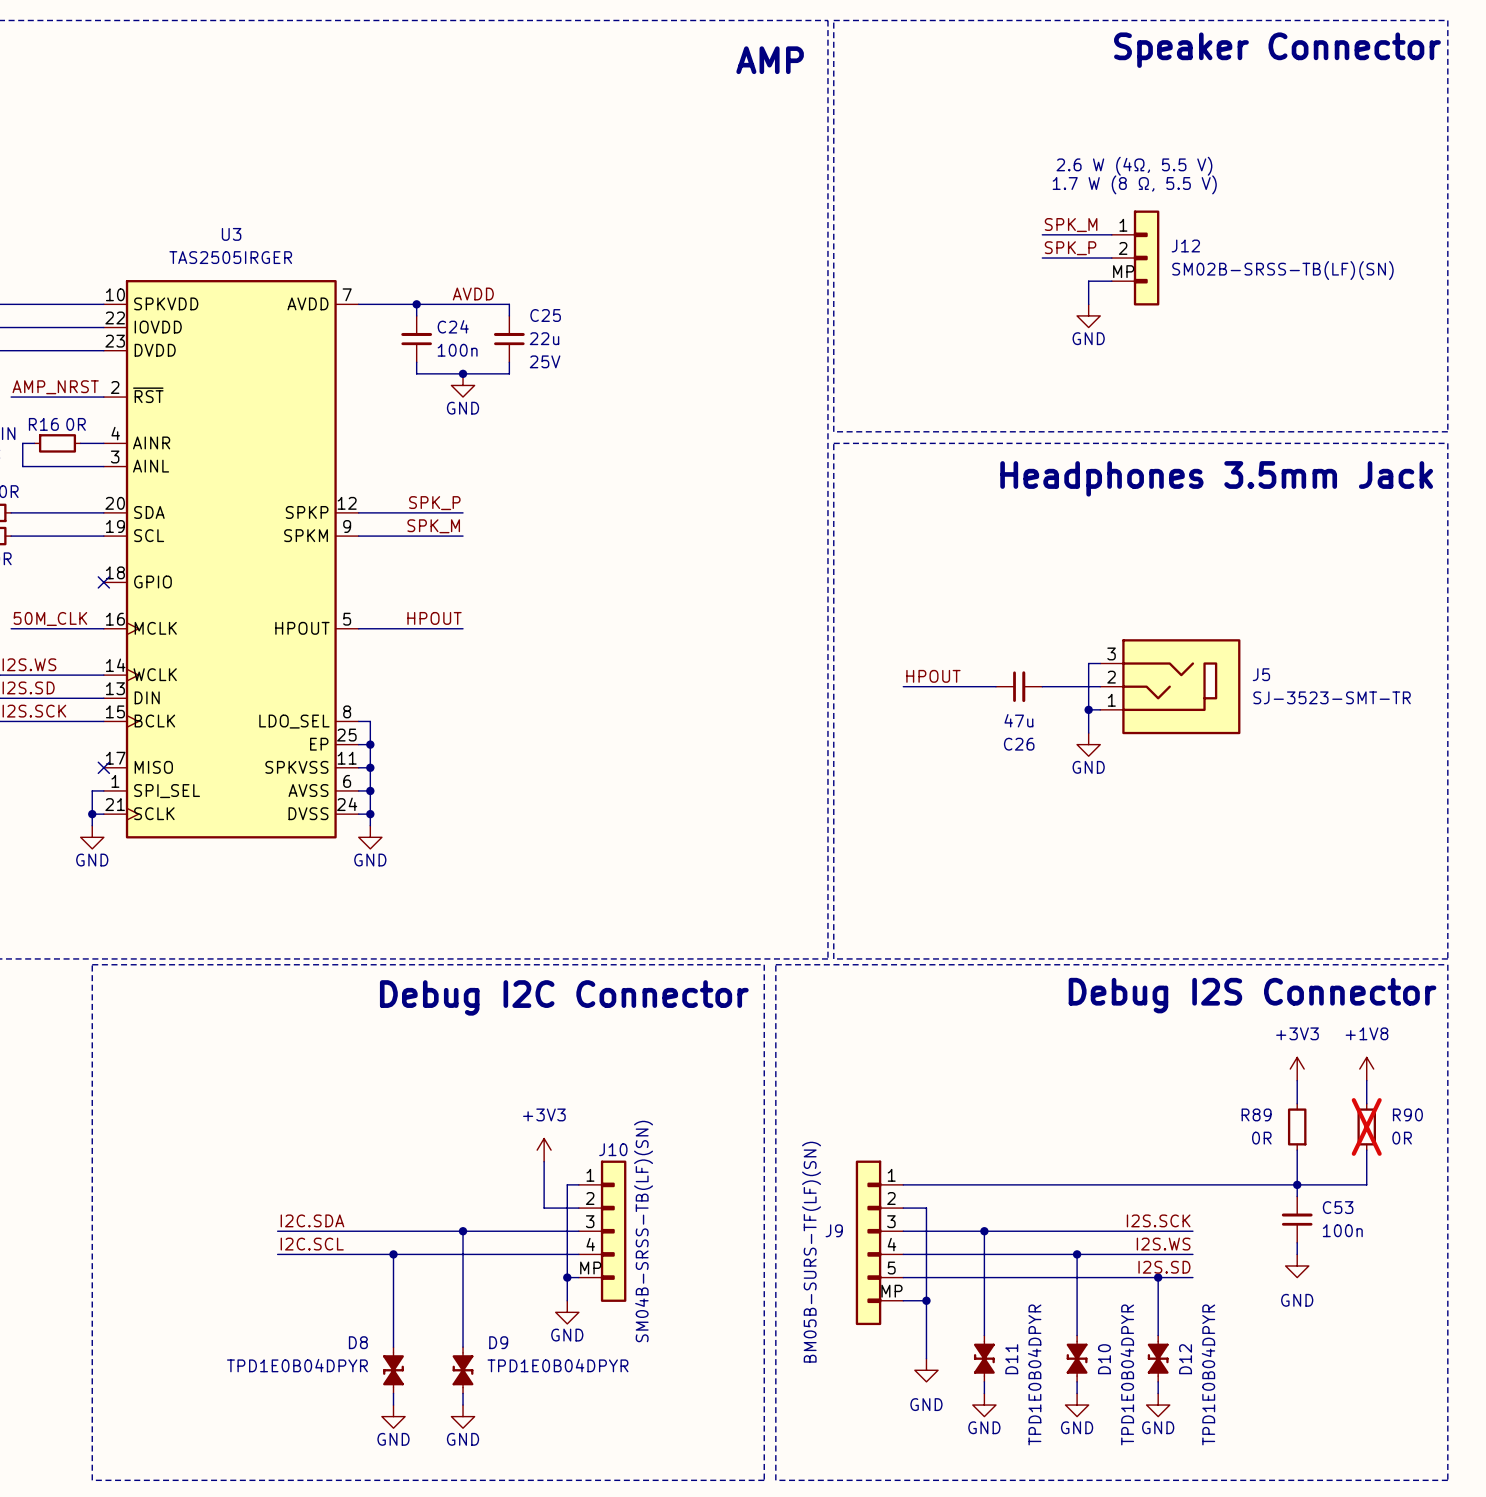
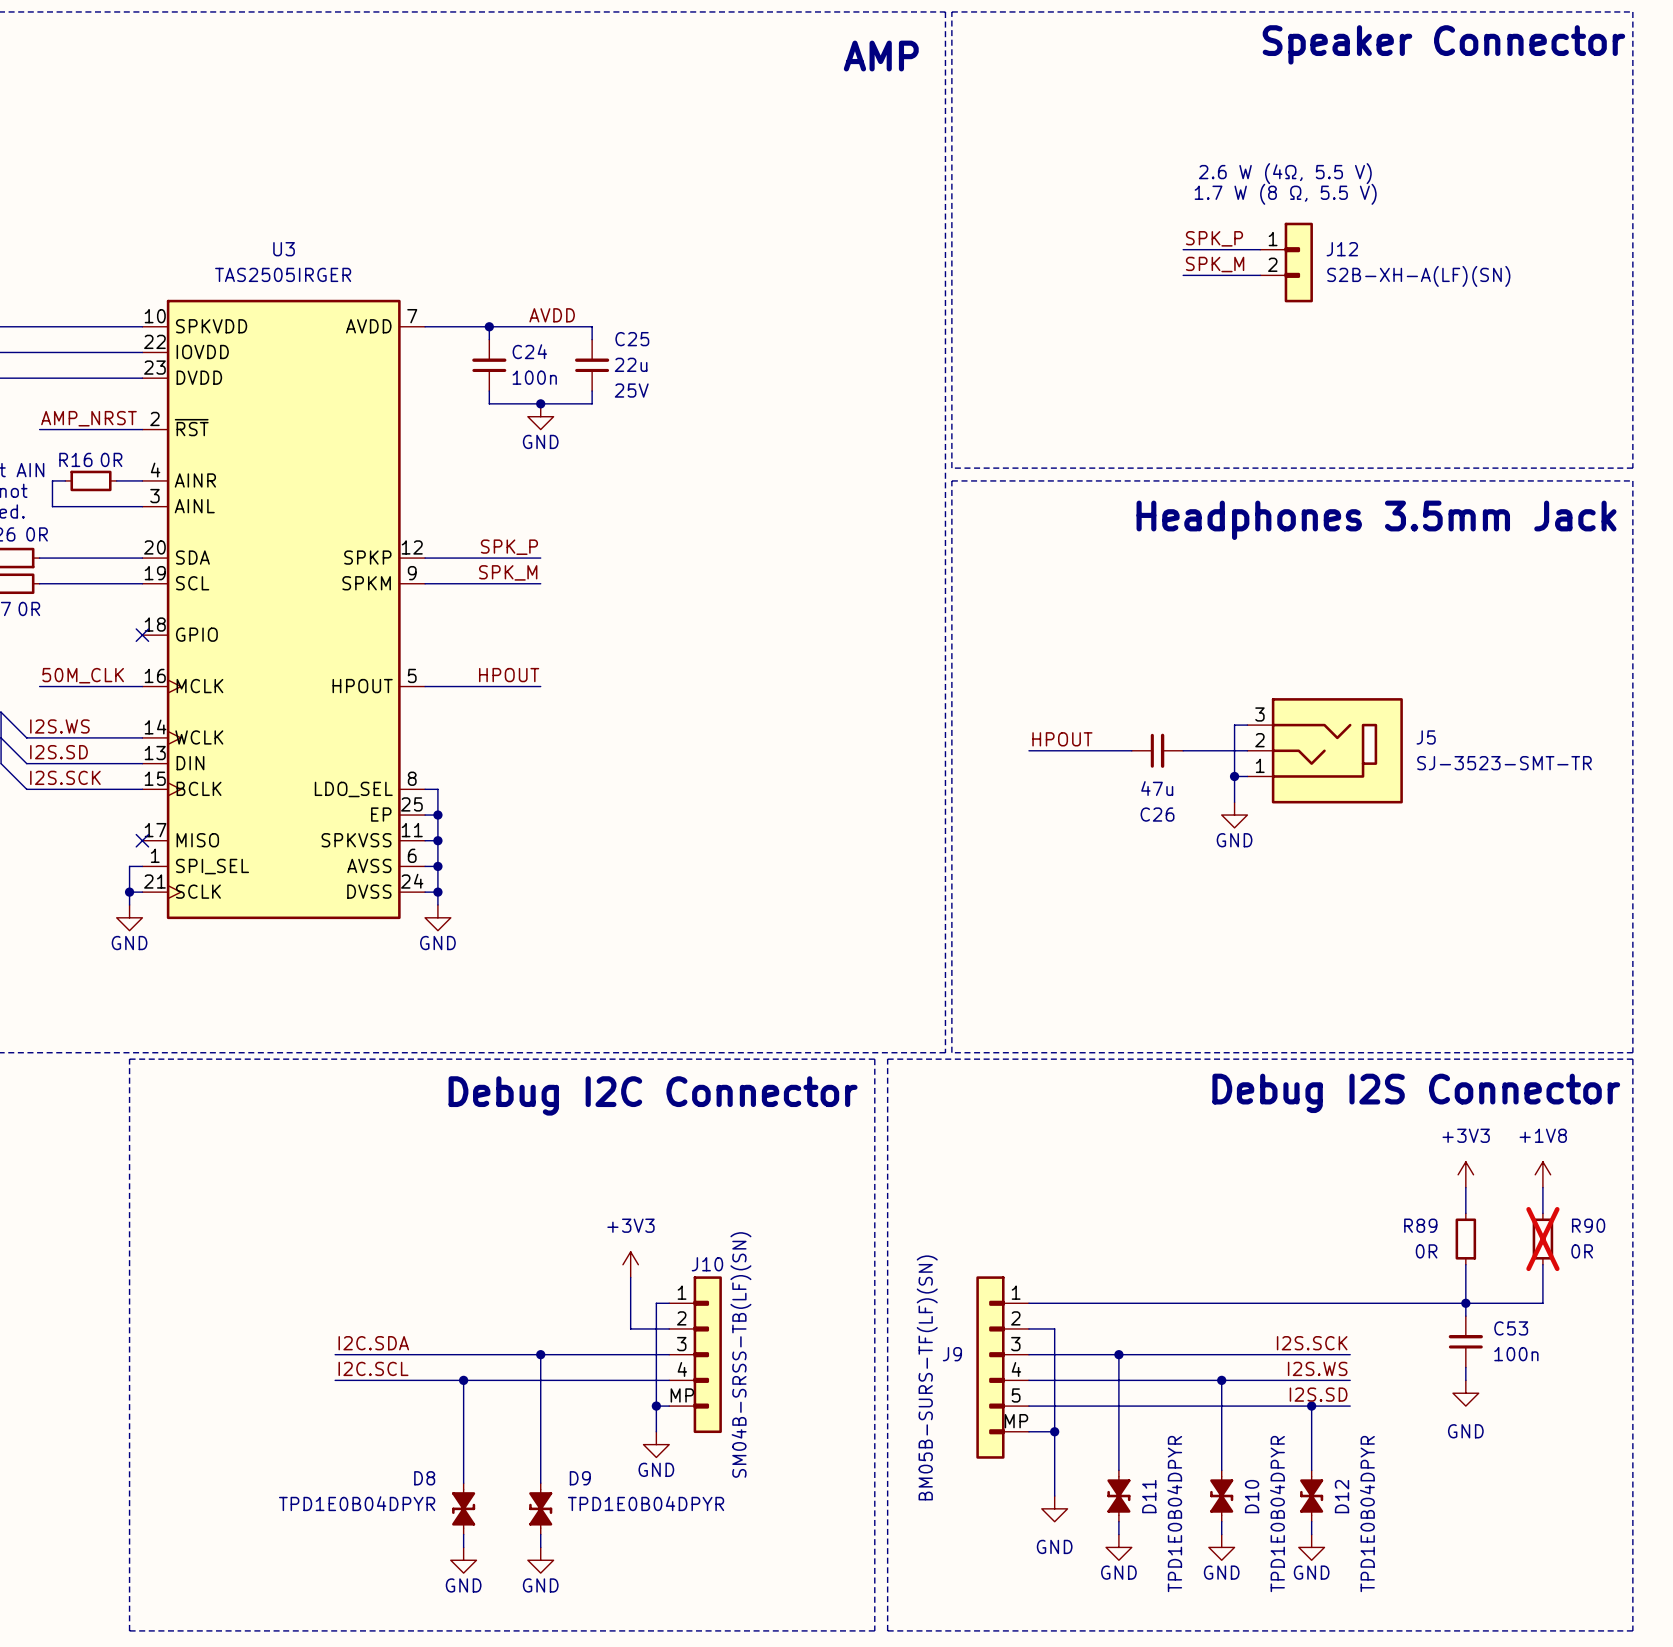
J12 symbol: [1111, 210, 1160, 306] -> [1260, 222, 1313, 303]
label: SPK_M (1071, 225) -> SPK_P (1214, 238)
label: SPK_P (1070, 248) -> SPK_M (1215, 264)
J12 text: SM02B-SRSS-TB(LF)(SN) (1282, 270) -> S2B-XH-A(LF)(SN) (1418, 276)
wire: (1111, 281) (1088, 281) (1088, 304) -> none
power symbol: GND (1088, 315) -> none

